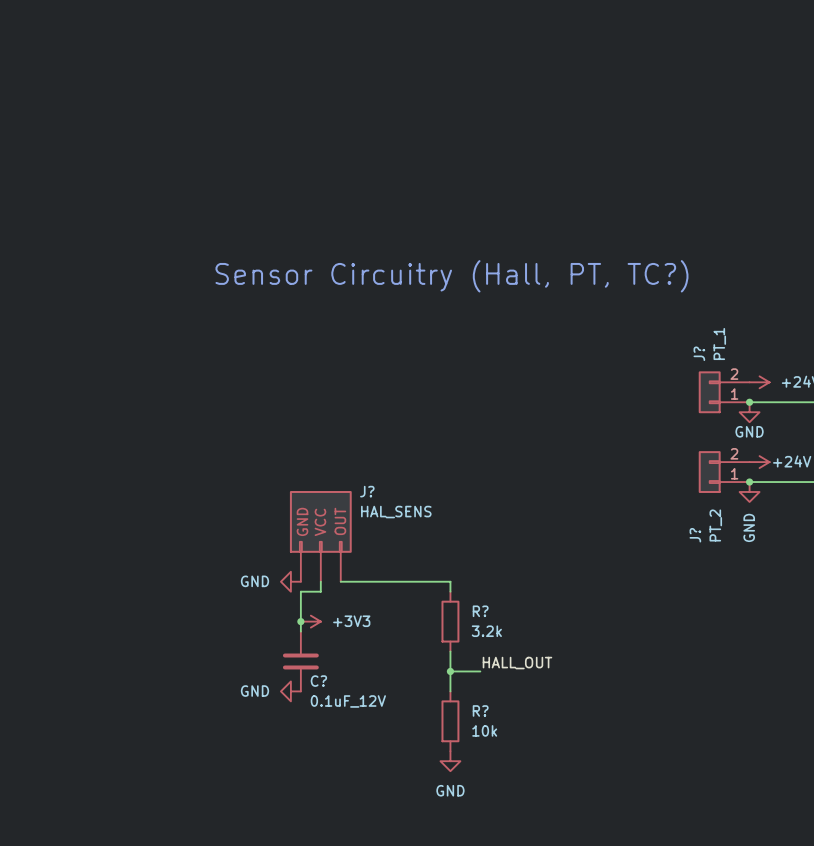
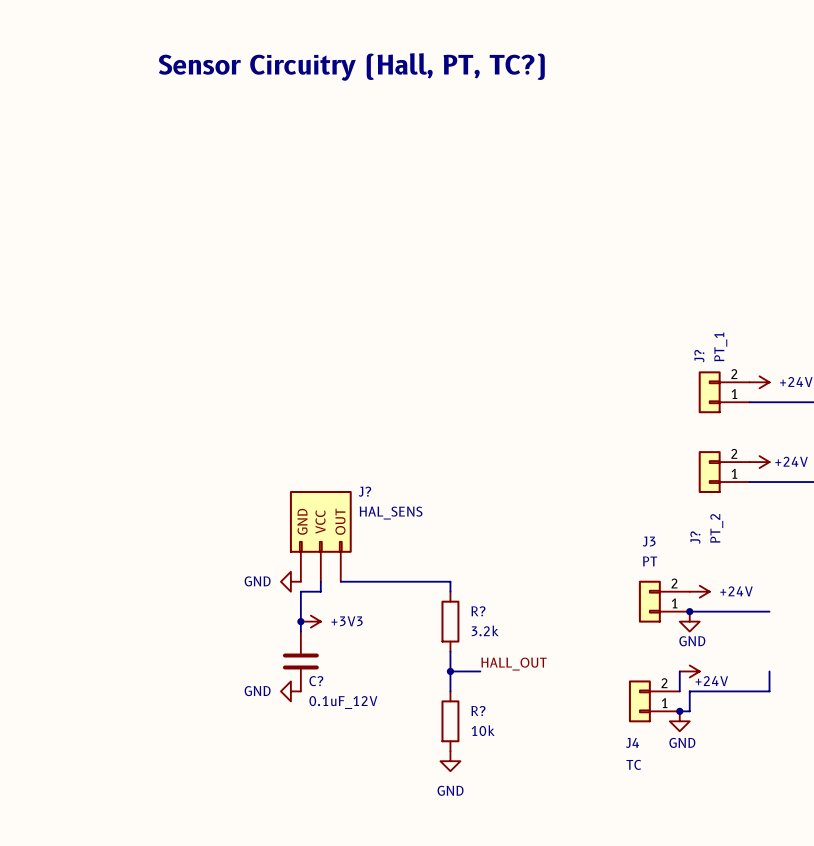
text: none -> Sensor Circuitry (Hall, PT, TC?) (351, 66)
text: Sensor Circuitry (Hall, PT, TC?) (451, 276) -> none
junction: (749, 402) -> none
power symbol: GND (749, 412) -> none
junction: (749, 482) -> none
power symbol: GND (749, 491) -> none
power symbol: none -> +24V (699, 591)
J3: none -> PT (664, 601)
wire: none -> (689, 611) (769, 611)
junction: none -> (689, 611)
power symbol: none -> GND (689, 621)
wire: none -> (679, 671) (679, 691)
power symbol: none -> +24V (689, 671)
wire: none -> (769, 671) (769, 691) (689, 691) (689, 711) (679, 711)
J4: none -> TC (654, 701)
junction: none -> (679, 711)
power symbol: none -> GND (679, 721)

